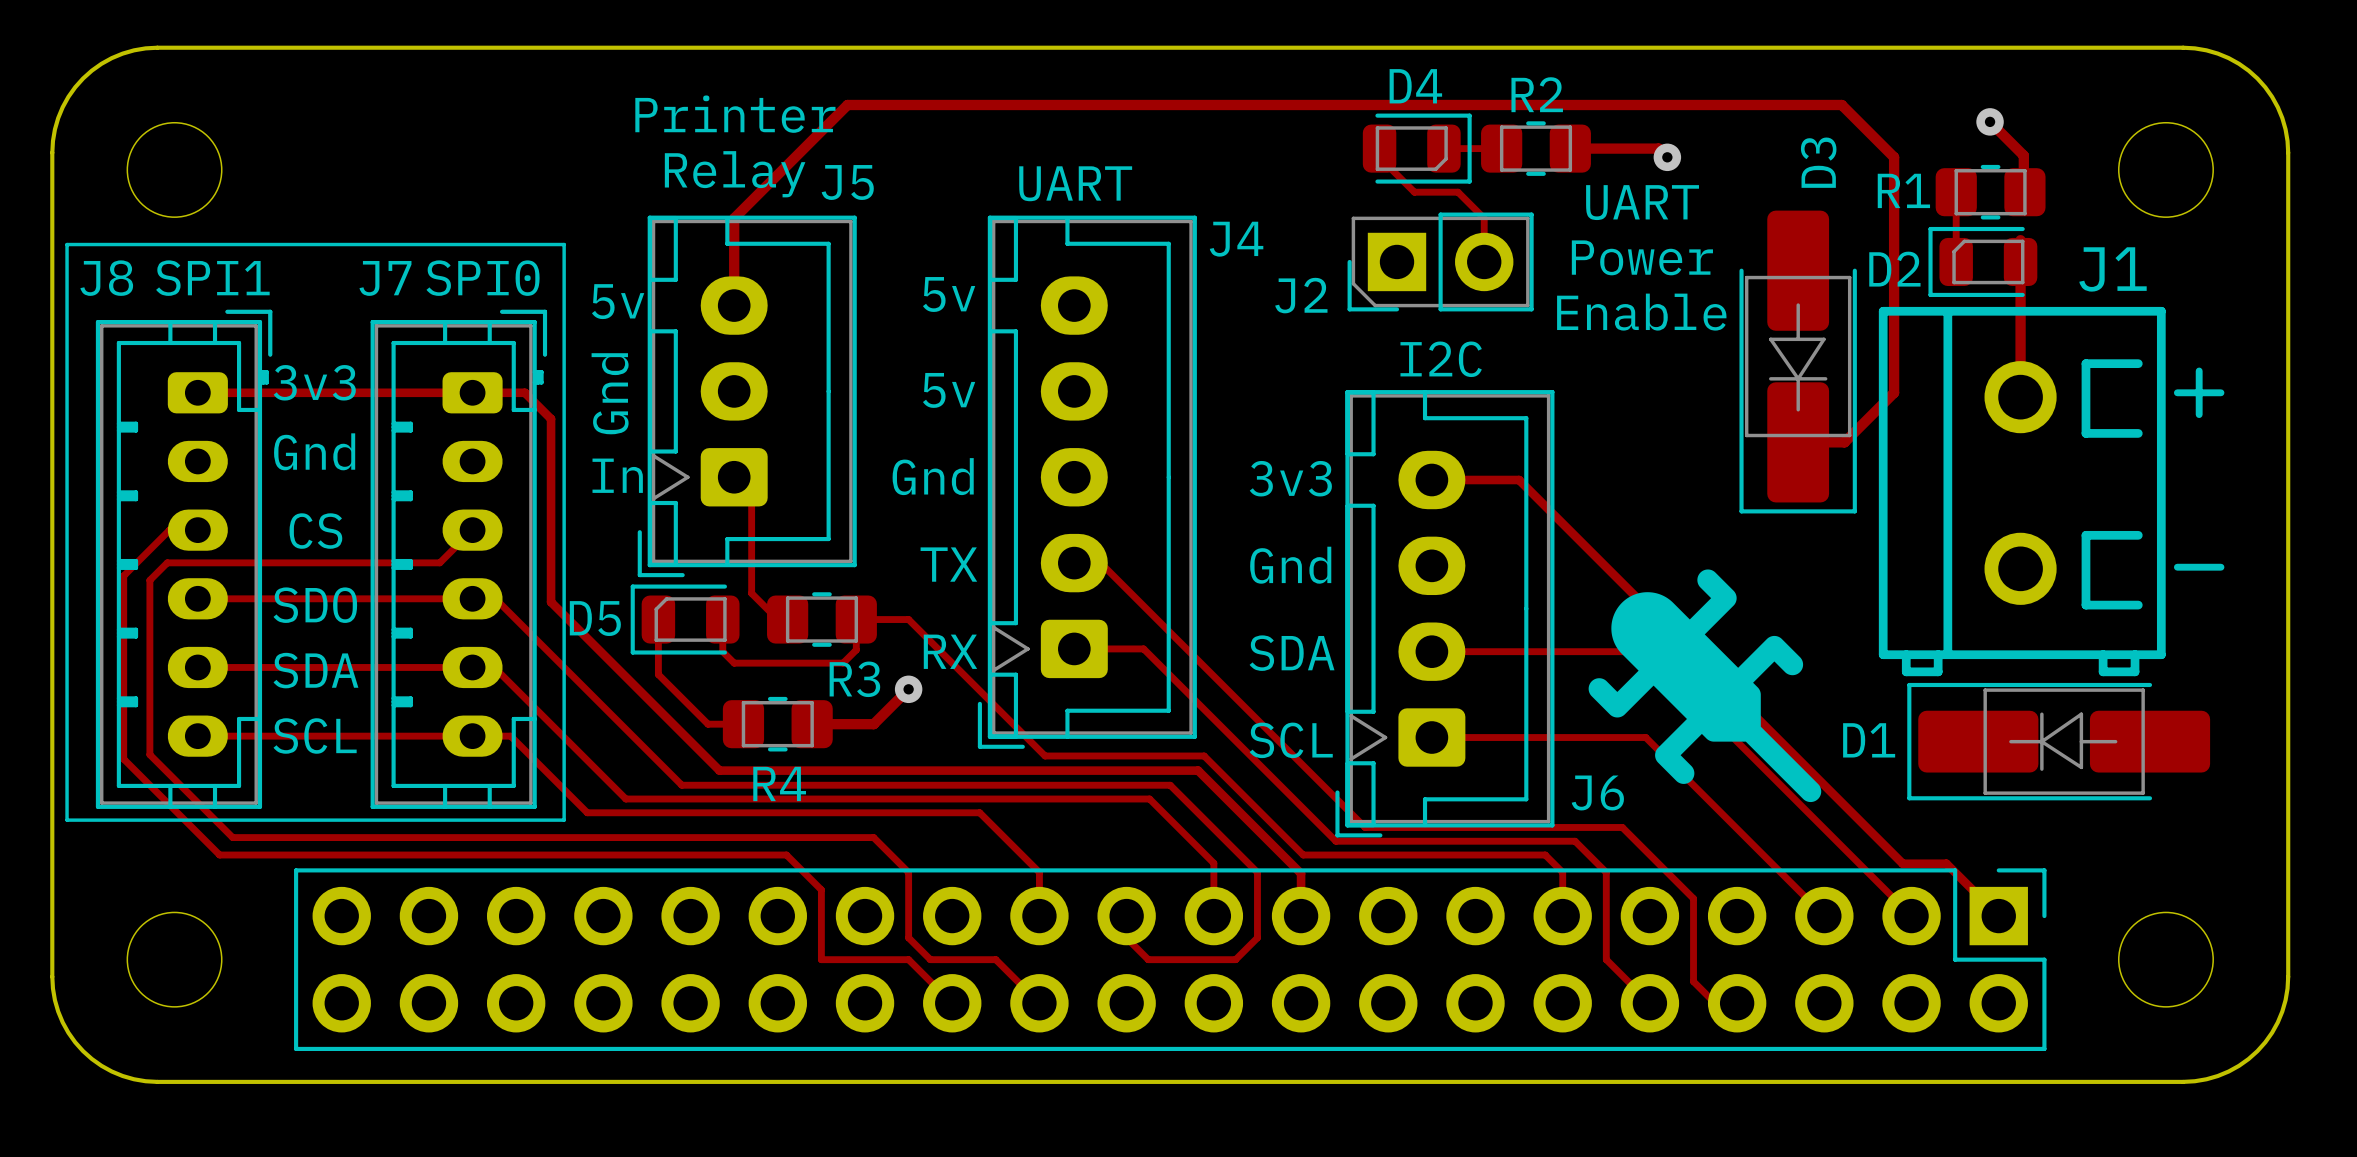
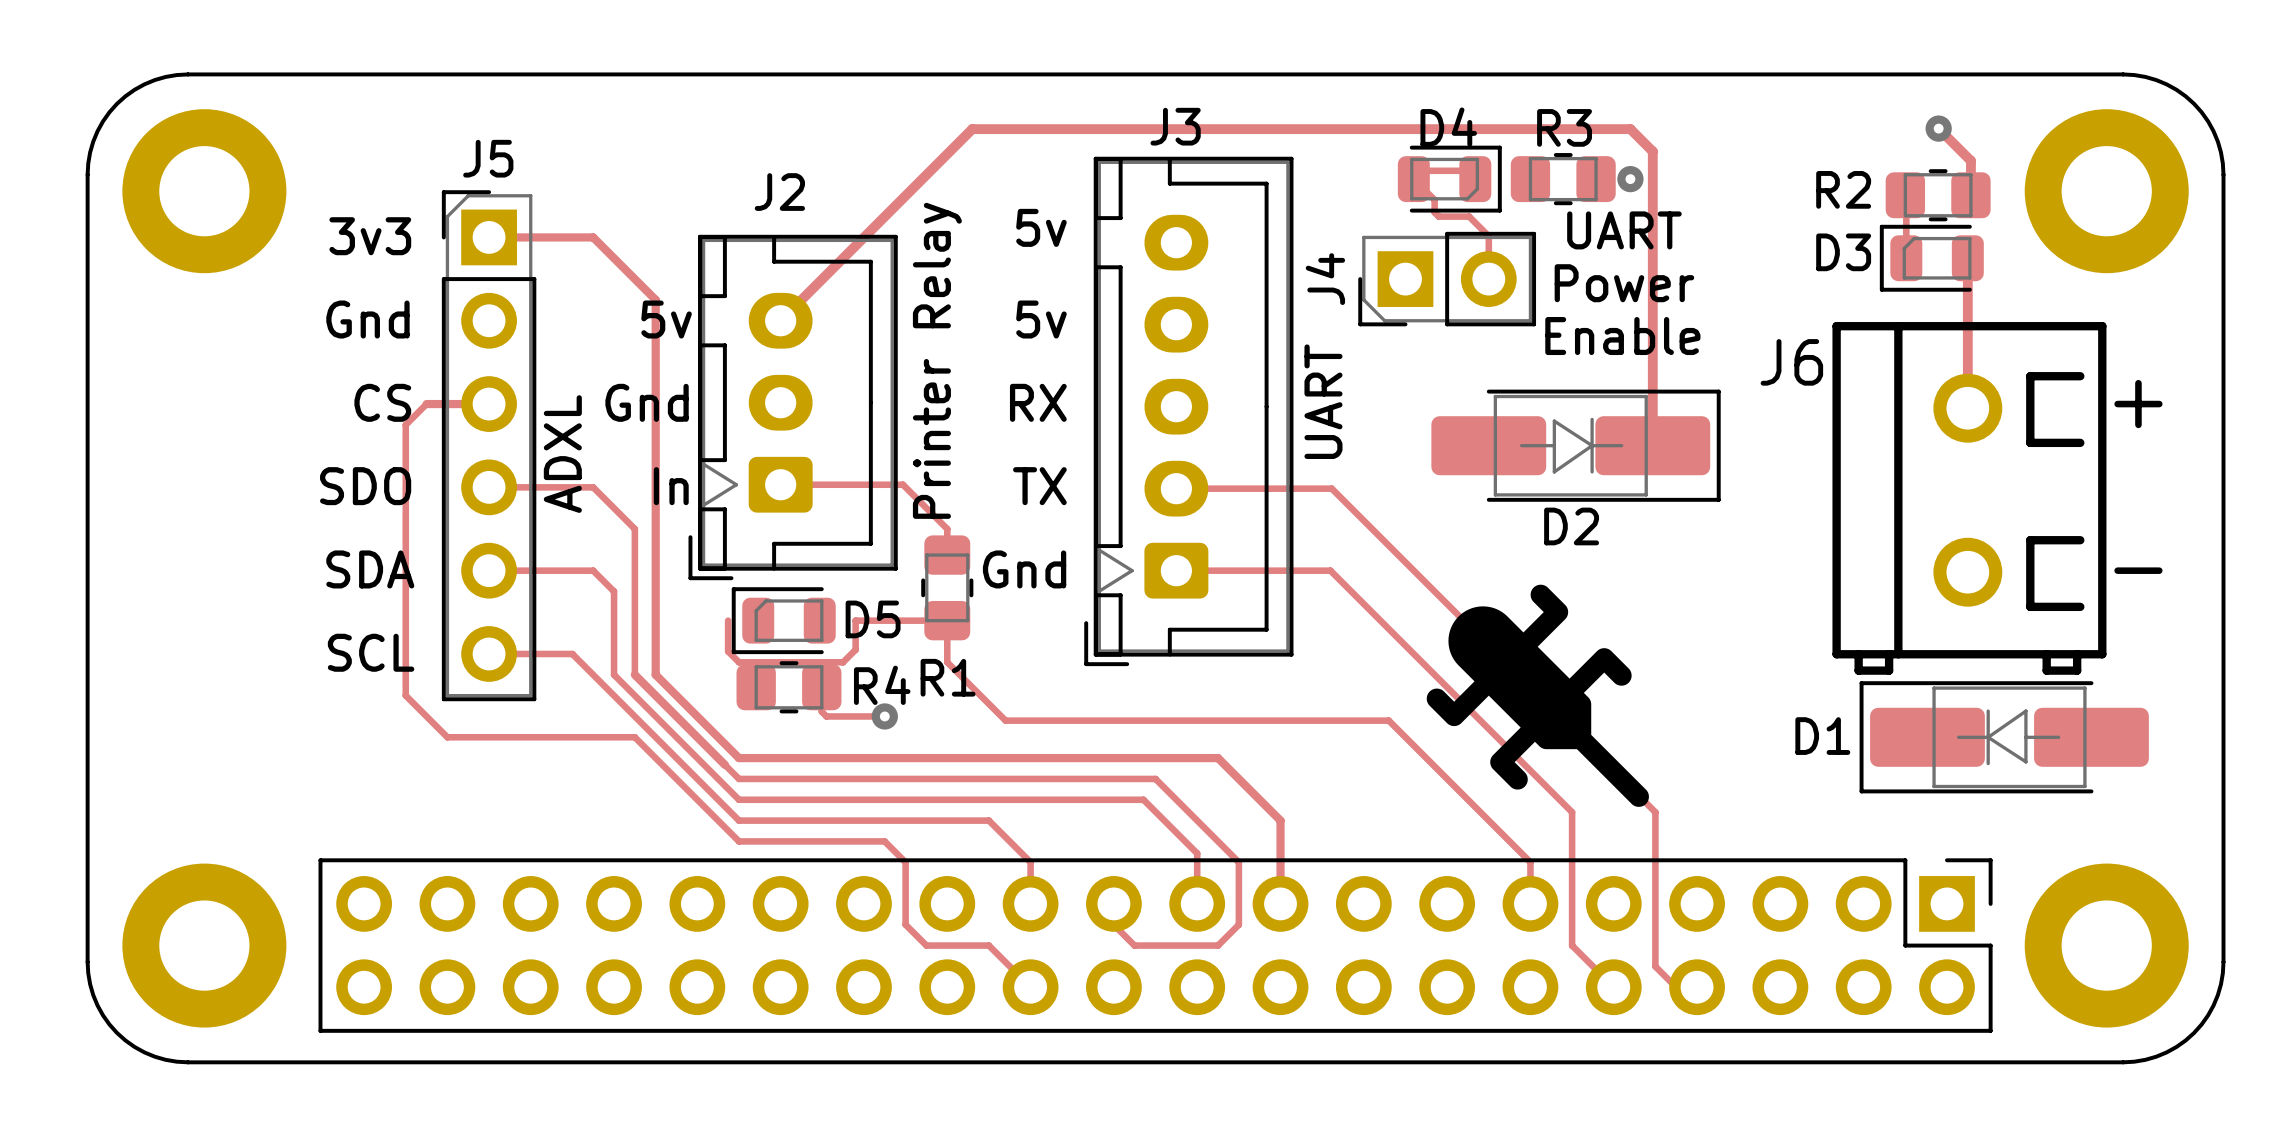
part footprint: [50, 45, 2291, 1084] -> [85, 72, 2226, 1065]
D4 name position: D4 (1415, 86) -> D4 (1448, 127)
R2 name position: R2 (1537, 94) -> R2 (1843, 189)
top track: (978, 104) (847, 104) (734, 218) (734, 305) -> (972, 129) (780, 320)
top track: (1667, 104) (1841, 104) (1894, 157) (1894, 392) (1844, 442) (1798, 442) -> (1630, 129) (1652, 151) (1652, 445)
text: Printer (735, 114) -> none
top track: (1990, 121) (2023, 155) -> (1938, 128) (1970, 160) (1970, 177)
via position: (1990, 121) -> (1938, 128)
D4 position: (1417, 148) -> (1449, 179)
R2 position: (1535, 148) -> (1938, 195)
top track: (1570, 148) (1658, 148) (1667, 157) -> none
top track: (1379, 157) (1414, 192) (1458, 192) (1484, 218) (1484, 261) -> none
top track: none -> (1413, 179) (1434, 199) (1434, 212) (1438, 216) (1469, 216) (1488, 236) (1488, 279)
D3 name position: D3 (1818, 162) -> D3 (1843, 252)
text: Relay (735, 174) -> none
J5 name position: J5 (847, 182) -> J5 (488, 158)
text rotation: 0° (1075, 183) -> 90° counterclockwise (1323, 401)
text position: UART (1075, 183) -> UART (1323, 401)
R1 name position: R1 (1903, 190) -> R1 (948, 677)
R1 rotation: 0° (1990, 192) -> 90° clockwise (947, 587)
R1 position: (1990, 192) -> (947, 587)
text position: UART (1642, 202) -> UART (1624, 230)
text: none -> 5v (1041, 227)
D3 footprint: [1739, 210, 1857, 514] -> [1879, 224, 1984, 292]
J2 footprint: [1347, 212, 1534, 312] -> [688, 234, 898, 581]
J5 footprint: [637, 215, 857, 578] -> [441, 190, 537, 702]
J4 footprint: [977, 215, 1197, 749] -> [1358, 231, 1537, 327]
D2 footprint: [1928, 226, 2038, 297] -> [1431, 389, 1721, 502]
J4 name position: J4 (1236, 239) -> J4 (1325, 279)
line: (67, 244) (564, 244) (564, 820) (67, 820) (67, 244) -> none
text position: Power (1642, 257) -> Power (1624, 283)
D2 name position: D2 (1894, 269) -> D2 (1571, 526)
J1 name: J1 (2112, 269) -> J6 (1791, 362)
text: SPI1 (212, 278) -> none
text: SPI0 (483, 278) -> none
text: 5v (949, 294) -> none
J2 name position: J2 (1301, 295) -> J2 (779, 192)
text position: 5v (618, 301) -> 5v (666, 319)
text: none -> Gnd (367, 319)
text: none -> 5v (1041, 319)
text position: Enable (1641, 312) -> Enable (1622, 336)
text: none -> Printer Relay (937, 360)
text: I2C (1441, 359) -> none
text position: 3v3 (314, 382) -> 3v3 (370, 236)
text: 5v (949, 390) -> none
top track: (197, 392) (407, 392) -> none
top track: (472, 392) (524, 392) (551, 418) (551, 602) (625, 676) -> (489, 493) (489, 487) (593, 487) (634, 529) (634, 674)
text rotation: 0° (610, 393) -> 90° clockwise (647, 402)
J3: none -> (1188, 411)
text: none -> ADXL (562, 454)
text: Gnd (314, 451) -> none
text position: In (617, 475) -> In (671, 486)
text: Gnd (933, 476) -> none
top track: (734, 477) (751, 494) (751, 593) (777, 619) (787, 619) -> none
top track: none -> (780, 484) (903, 484) (947, 529) (947, 555)
text: 3v3 (1290, 478) -> none
top track: (1431, 480) (1519, 480) (1902, 863) (1946, 863) (1998, 916) -> none
top track: (197, 530) (169, 530) (123, 575) (123, 759) (219, 855) (786, 855) (821, 889) (821, 959) (908, 959) (952, 1003) -> none
top track: (472, 530) (439, 562) (167, 562) (149, 580) (149, 754) (232, 837) (873, 837) (886, 850) -> (426, 404) (405, 424) (405, 695) (447, 737) (634, 737) (739, 841) (884, 841)
text position: CS (315, 531) -> CS (382, 402)
J8: (184, 559) -> none
J7: (458, 559) -> none
top track: (1074, 563) (1100, 563) (1365, 827) (1622, 827) (1693, 898) -> (1176, 488) (1331, 488) (1655, 812) (1655, 887)
text position: TX (948, 564) -> TX (1039, 486)
text: none -> Gnd (1024, 569)
text: Gnd (1290, 565) -> none
top track: (197, 598) (495, 598) (681, 785) (734, 785) -> (725, 764) (739, 778)
text position: SDO (315, 605) -> SDO (365, 486)
J6: (1444, 613) -> none
D5 name position: D5 (595, 618) -> D5 (873, 619)
top track: (658, 619) (658, 674) (708, 724) (743, 724) -> none
D5 position: (685, 619) -> (783, 620)
R3 position: (821, 619) -> (1563, 179)
top track: (908, 619) (952, 663) -> (905, 620) (947, 620) (947, 662)
top track: (1074, 648) (1143, 648) (1335, 841) (1575, 841) (1606, 872) -> (1176, 570) (1330, 570) (1572, 812) (1572, 862)
text position: RX (950, 651) -> RX (1038, 402)
top track: (1431, 651) (1647, 651) (1911, 916) -> none
text: SDA (1292, 653) -> none
top track: (197, 667) (494, 667) (625, 799) (1149, 799) (1157, 807) -> (489, 570) (593, 570) (614, 591) (614, 674) (739, 799) (1143, 799)
text position: SDA (315, 670) -> SDA (370, 569)
R3 name position: R3 (854, 679) -> R3 (1564, 127)
drawing position: (1704, 685) -> (1537, 695)
top track: none -> (821, 687) (821, 711) (826, 716) (884, 716)
top track: (908, 689) (873, 724) (812, 724) -> none
via position: (908, 689) -> (884, 716)
R4 position: (777, 724) -> (788, 687)
top track: (1013, 724) (1045, 755) (1204, 755) (1303, 855) (1545, 855) -> (1005, 720) (1388, 720) (1513, 845)
text position: SCL (315, 735) -> SCL (371, 652)
top track: (197, 736) (510, 736) (587, 812) (979, 812) (995, 828) -> (489, 653) (572, 653) (739, 820) (988, 820)
top track: (1431, 737) (1645, 737) (1824, 916) -> none
text: SCL (1291, 740) -> none
top track: (719, 770) (1198, 770) (1301, 873) -> (489, 237) (593, 237) (655, 299) (655, 674) (739, 758) (1218, 758) (1280, 820) (1280, 863)
R4 name position: R4 (779, 783) -> R4 (882, 685)

